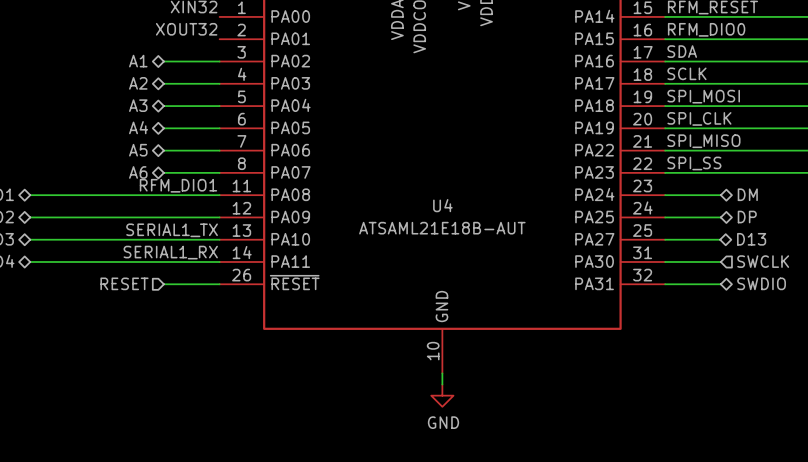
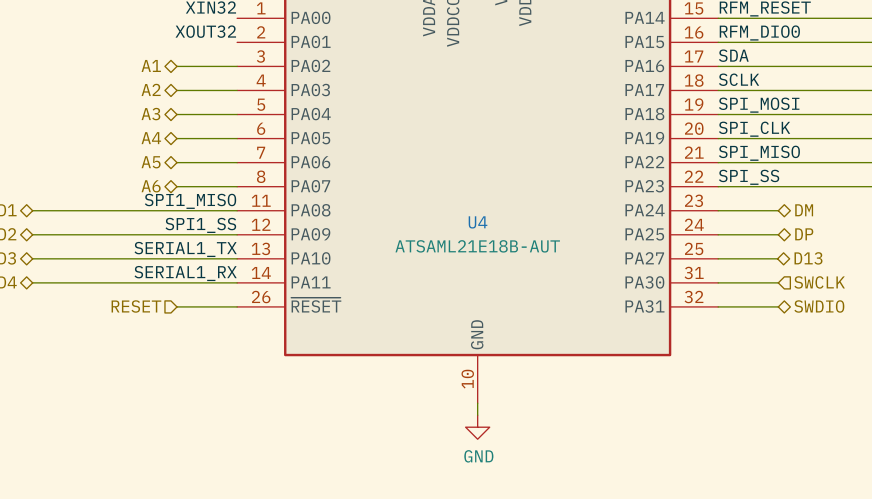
label: RFM_DIO1 (178, 185) -> SPI1_MISO (190, 201)
label: none -> SPI1_SS (200, 225)

